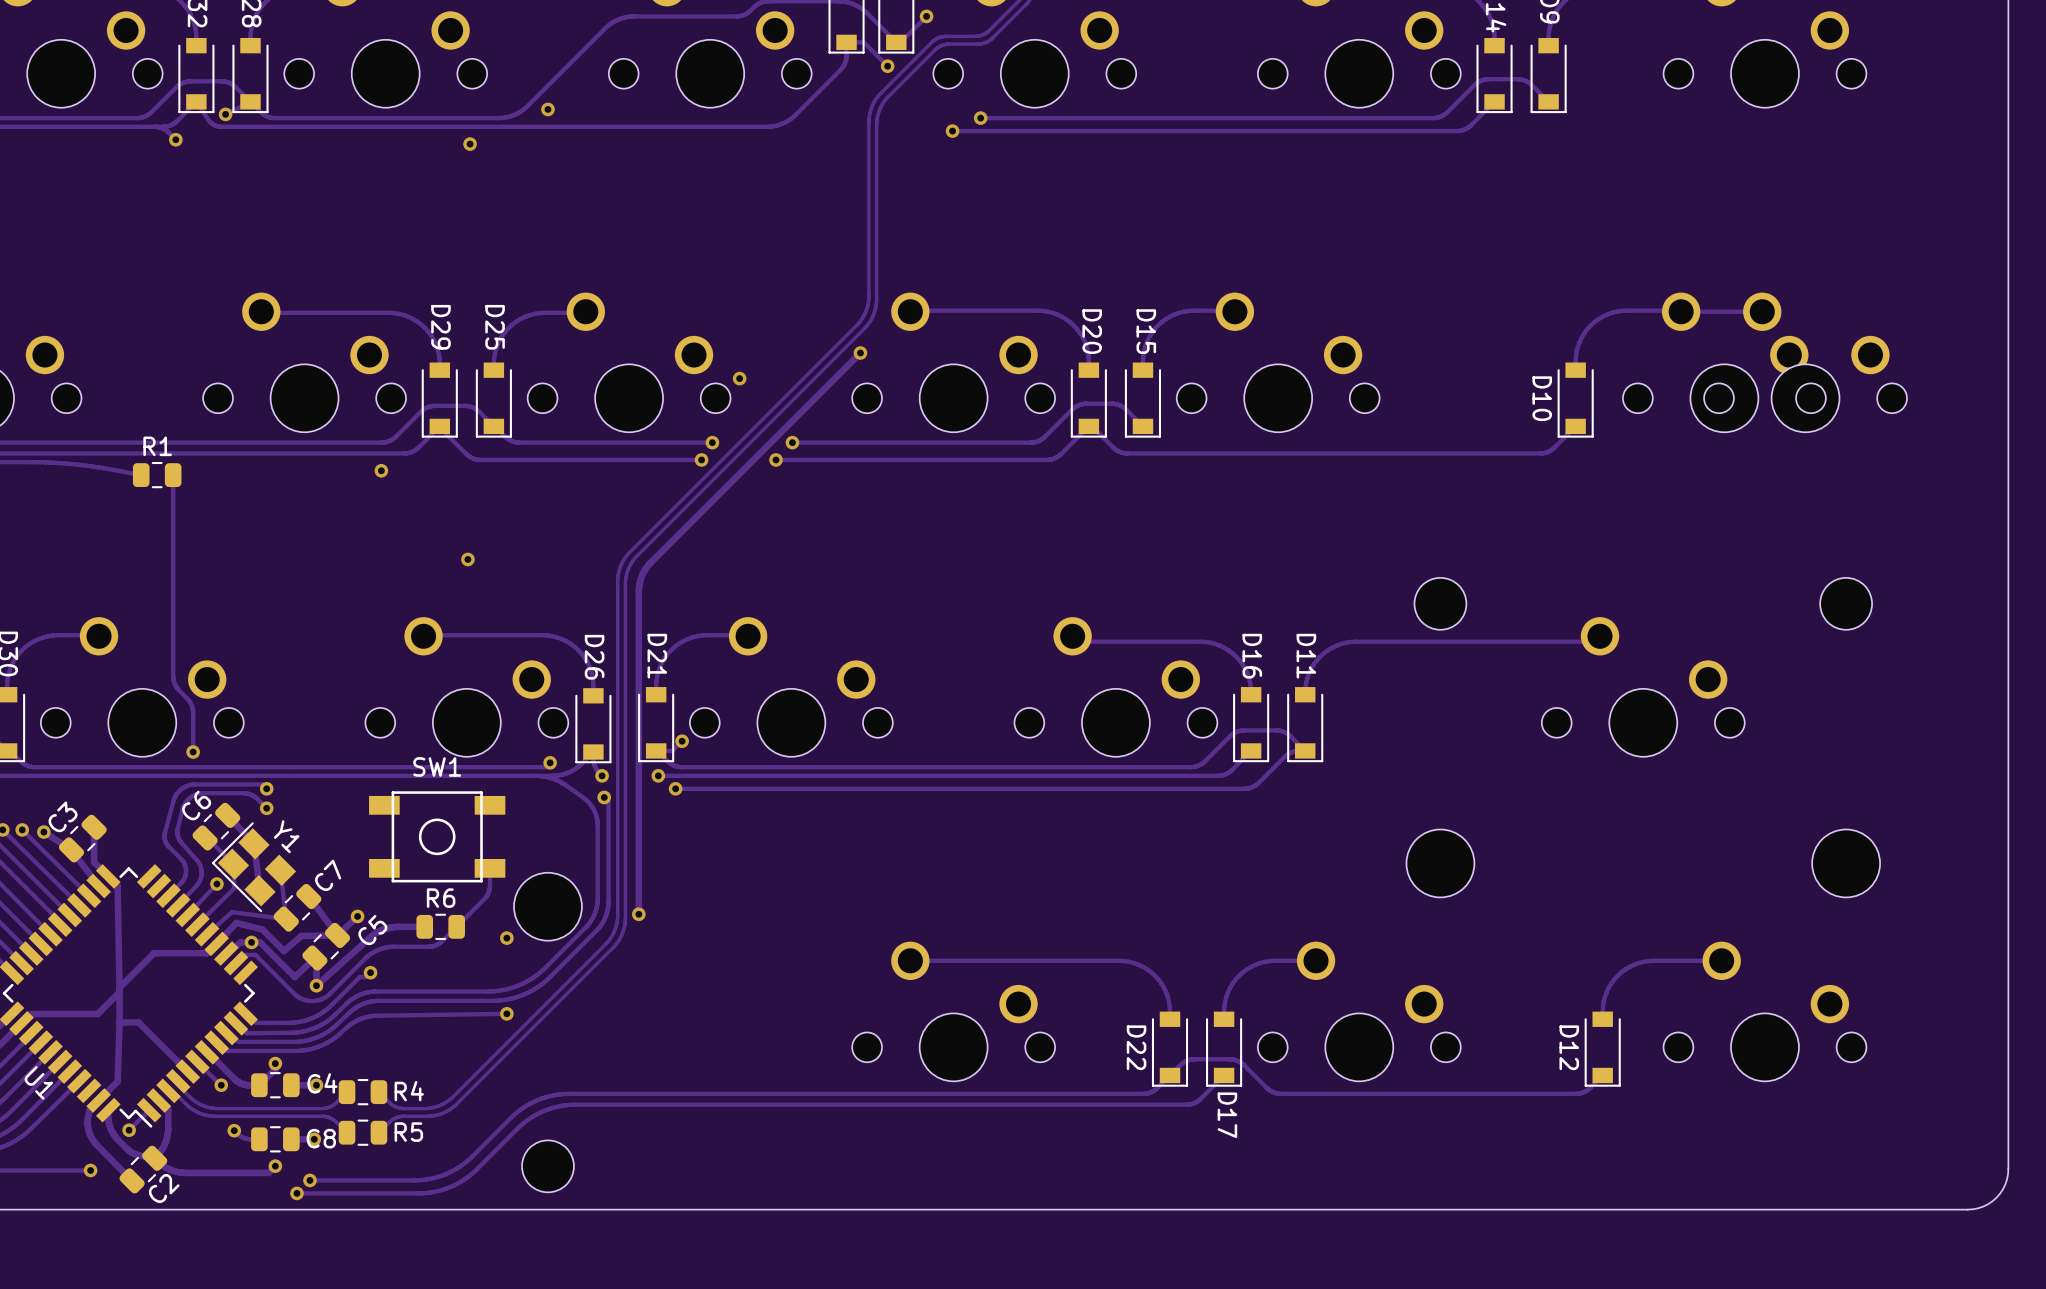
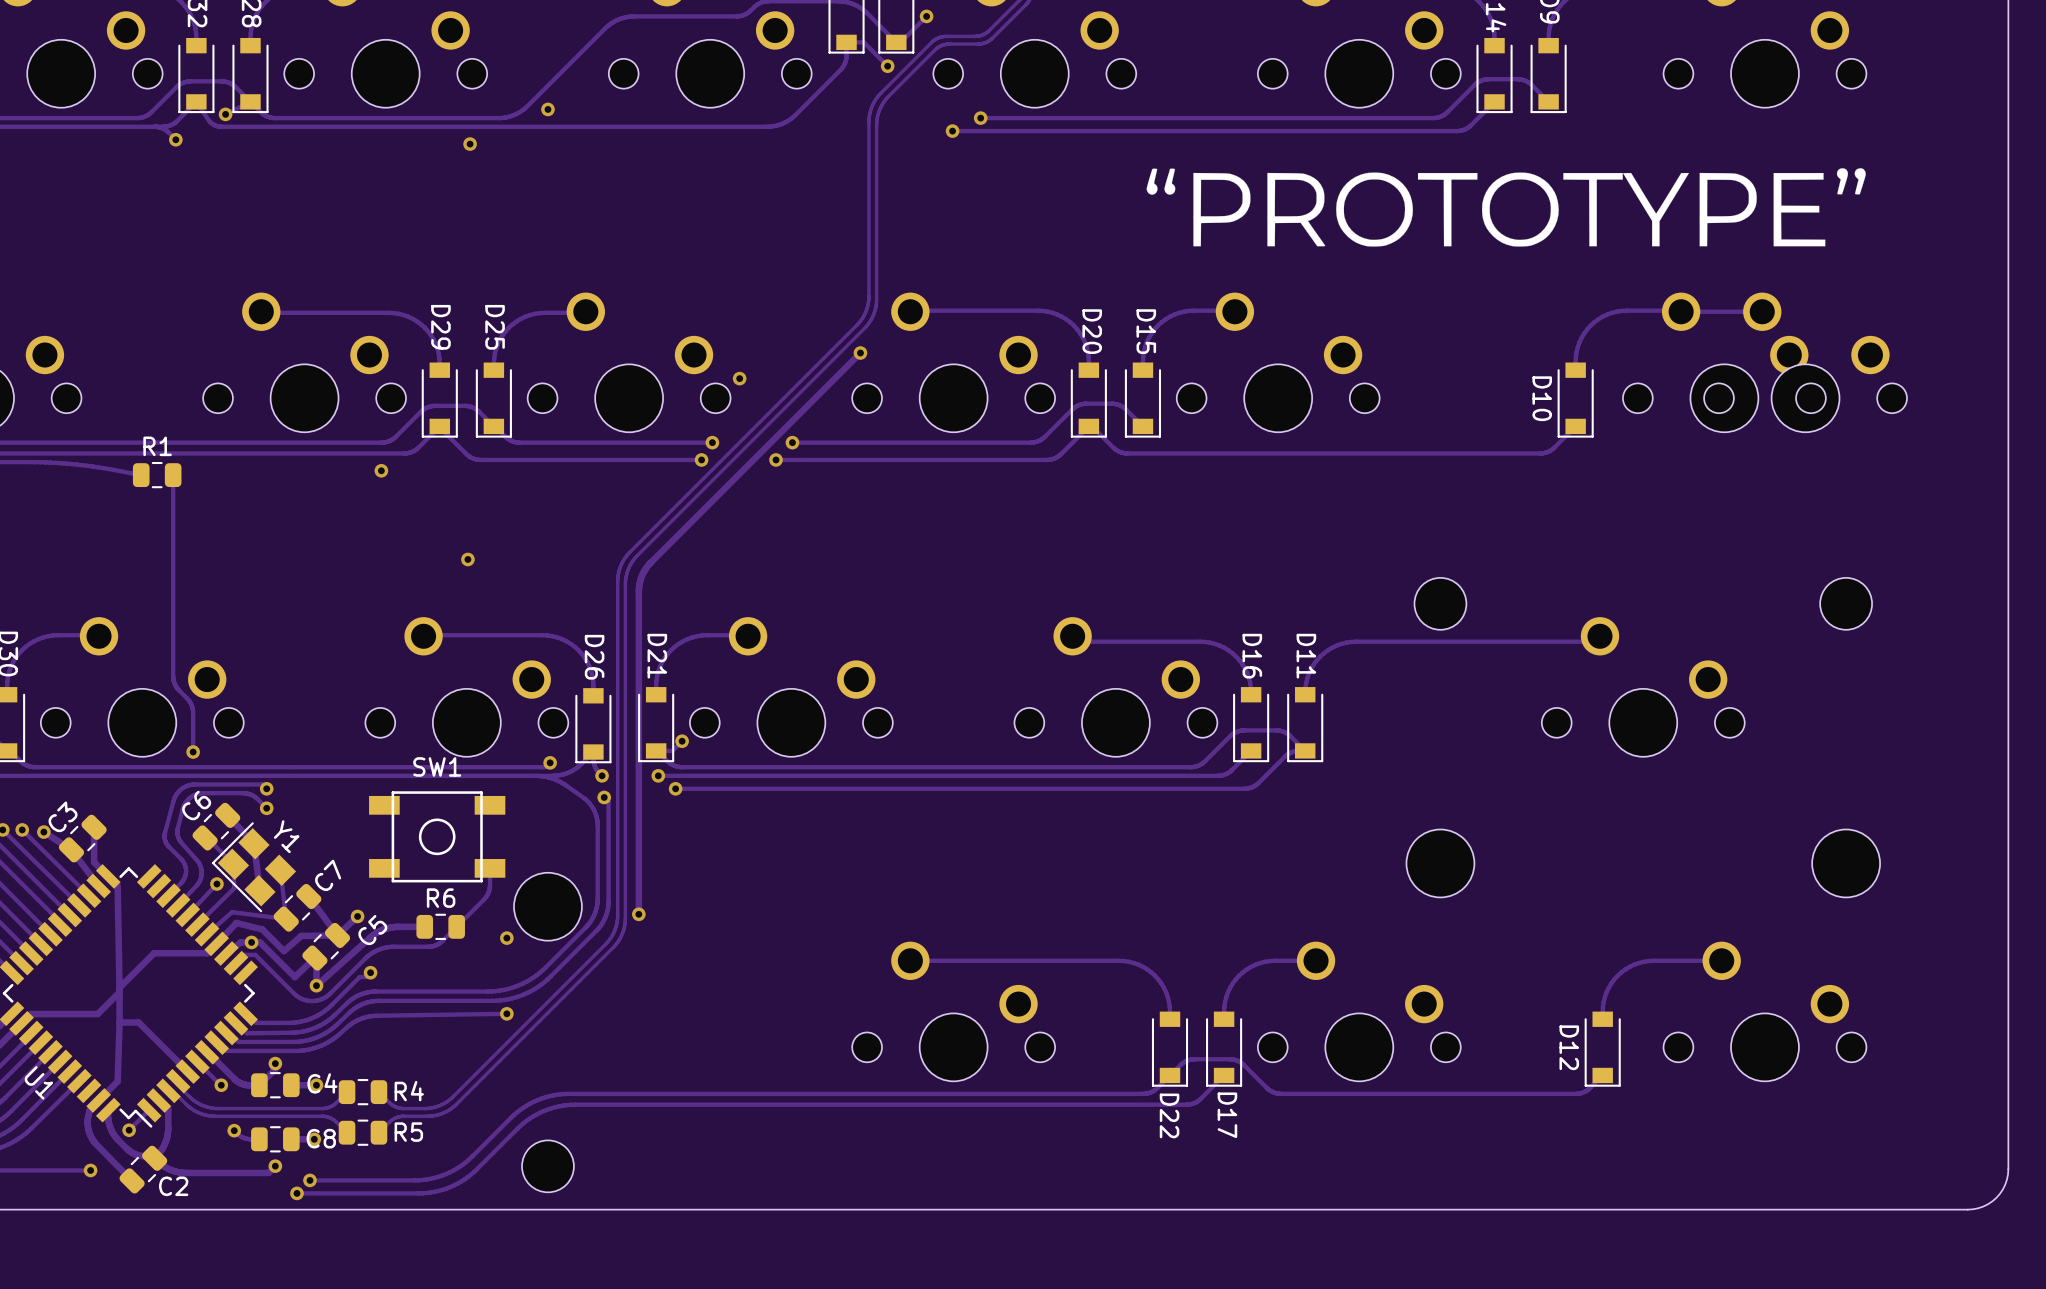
drawing: none -> [1146, 168, 1866, 247]
D22 name position: D22 (1136, 1047) -> D22 (1169, 1115)
C2 name rotation: 0° (164, 1188) -> 45° clockwise (173, 1186)

